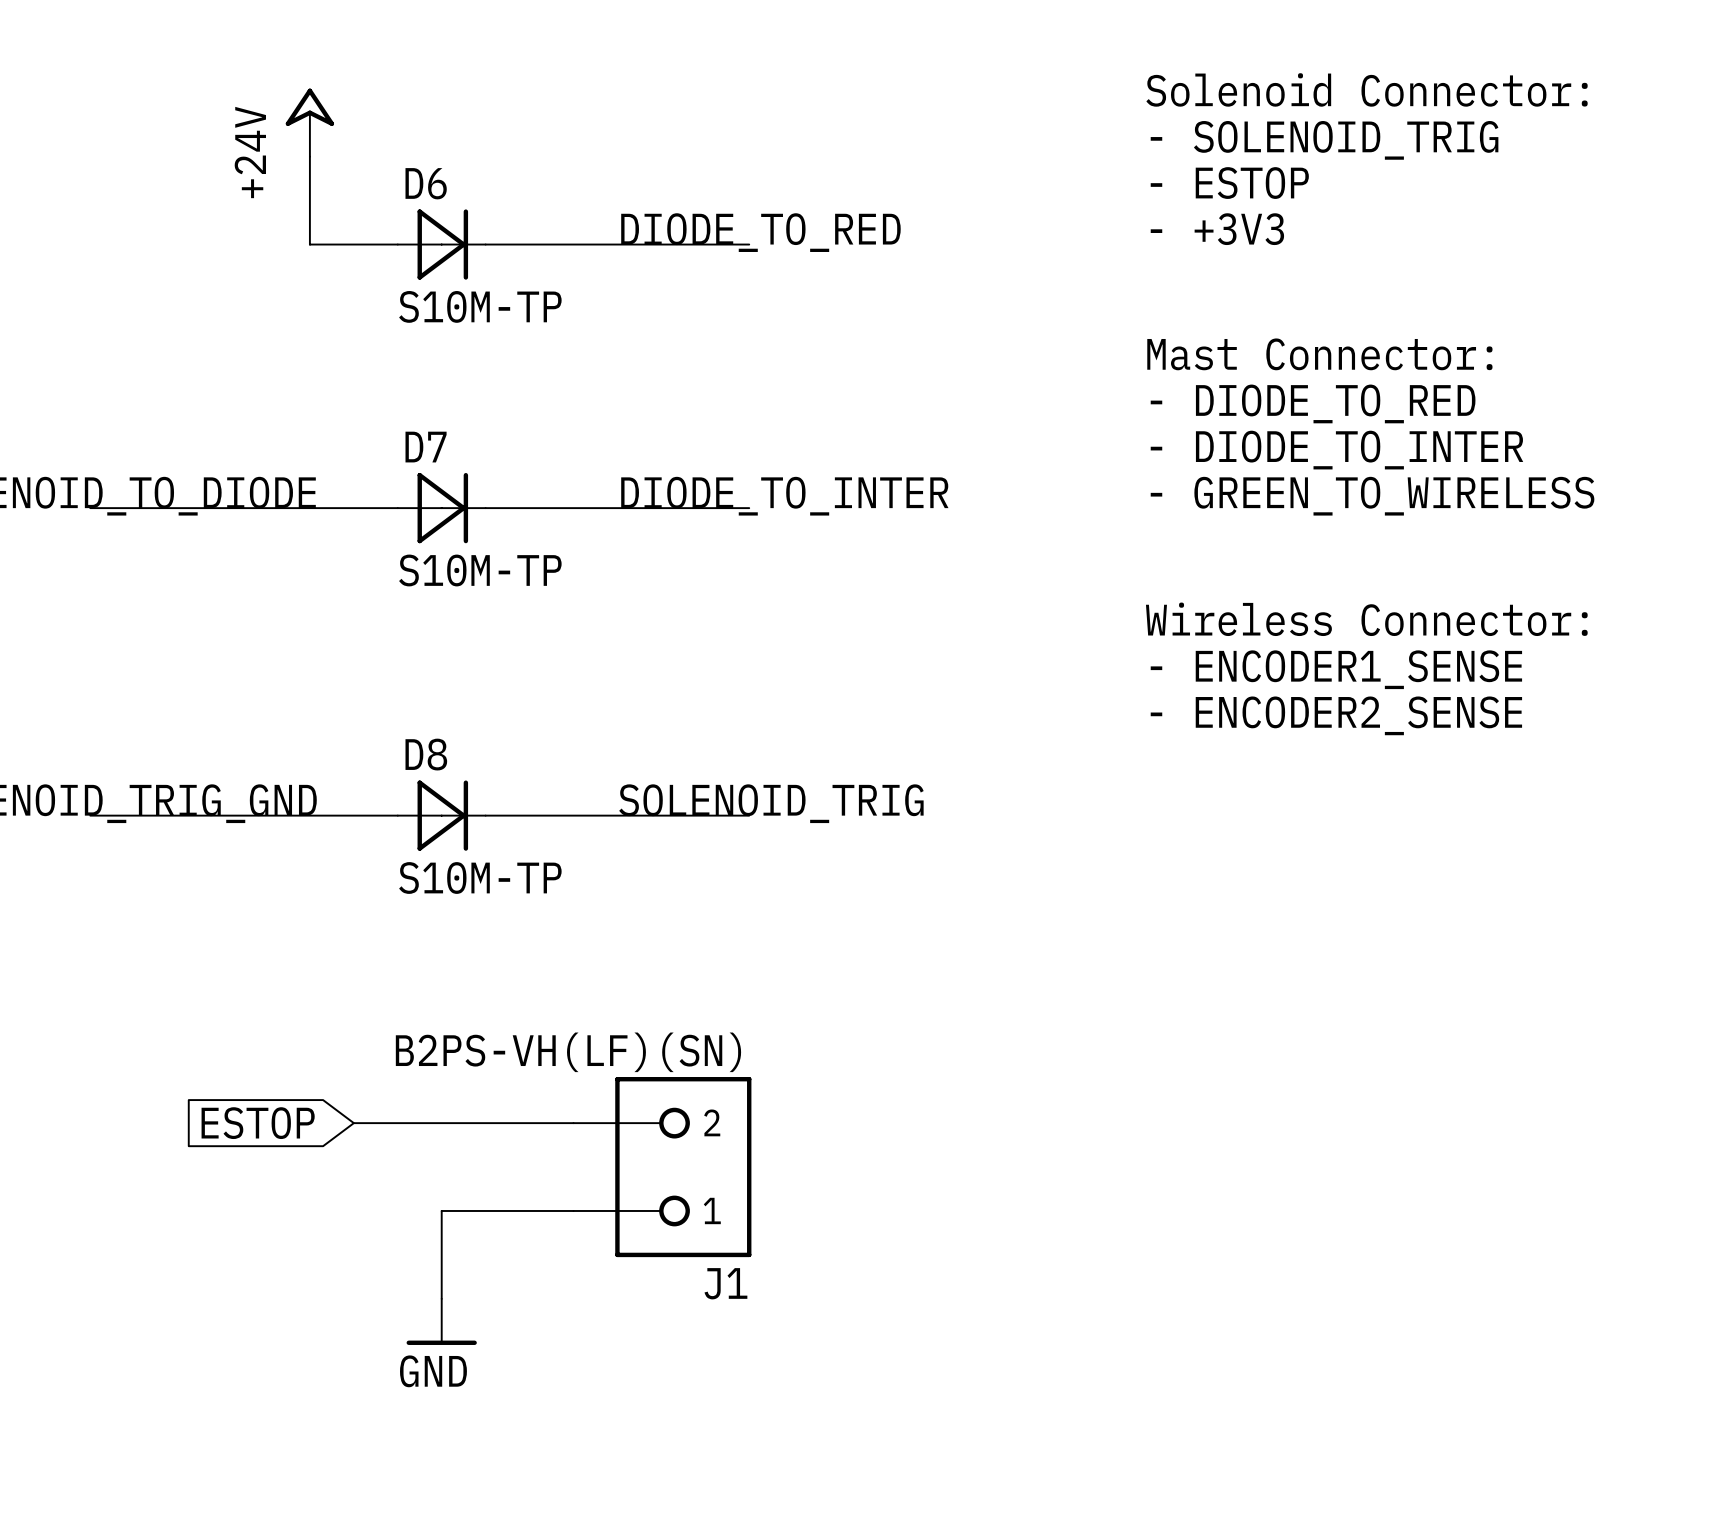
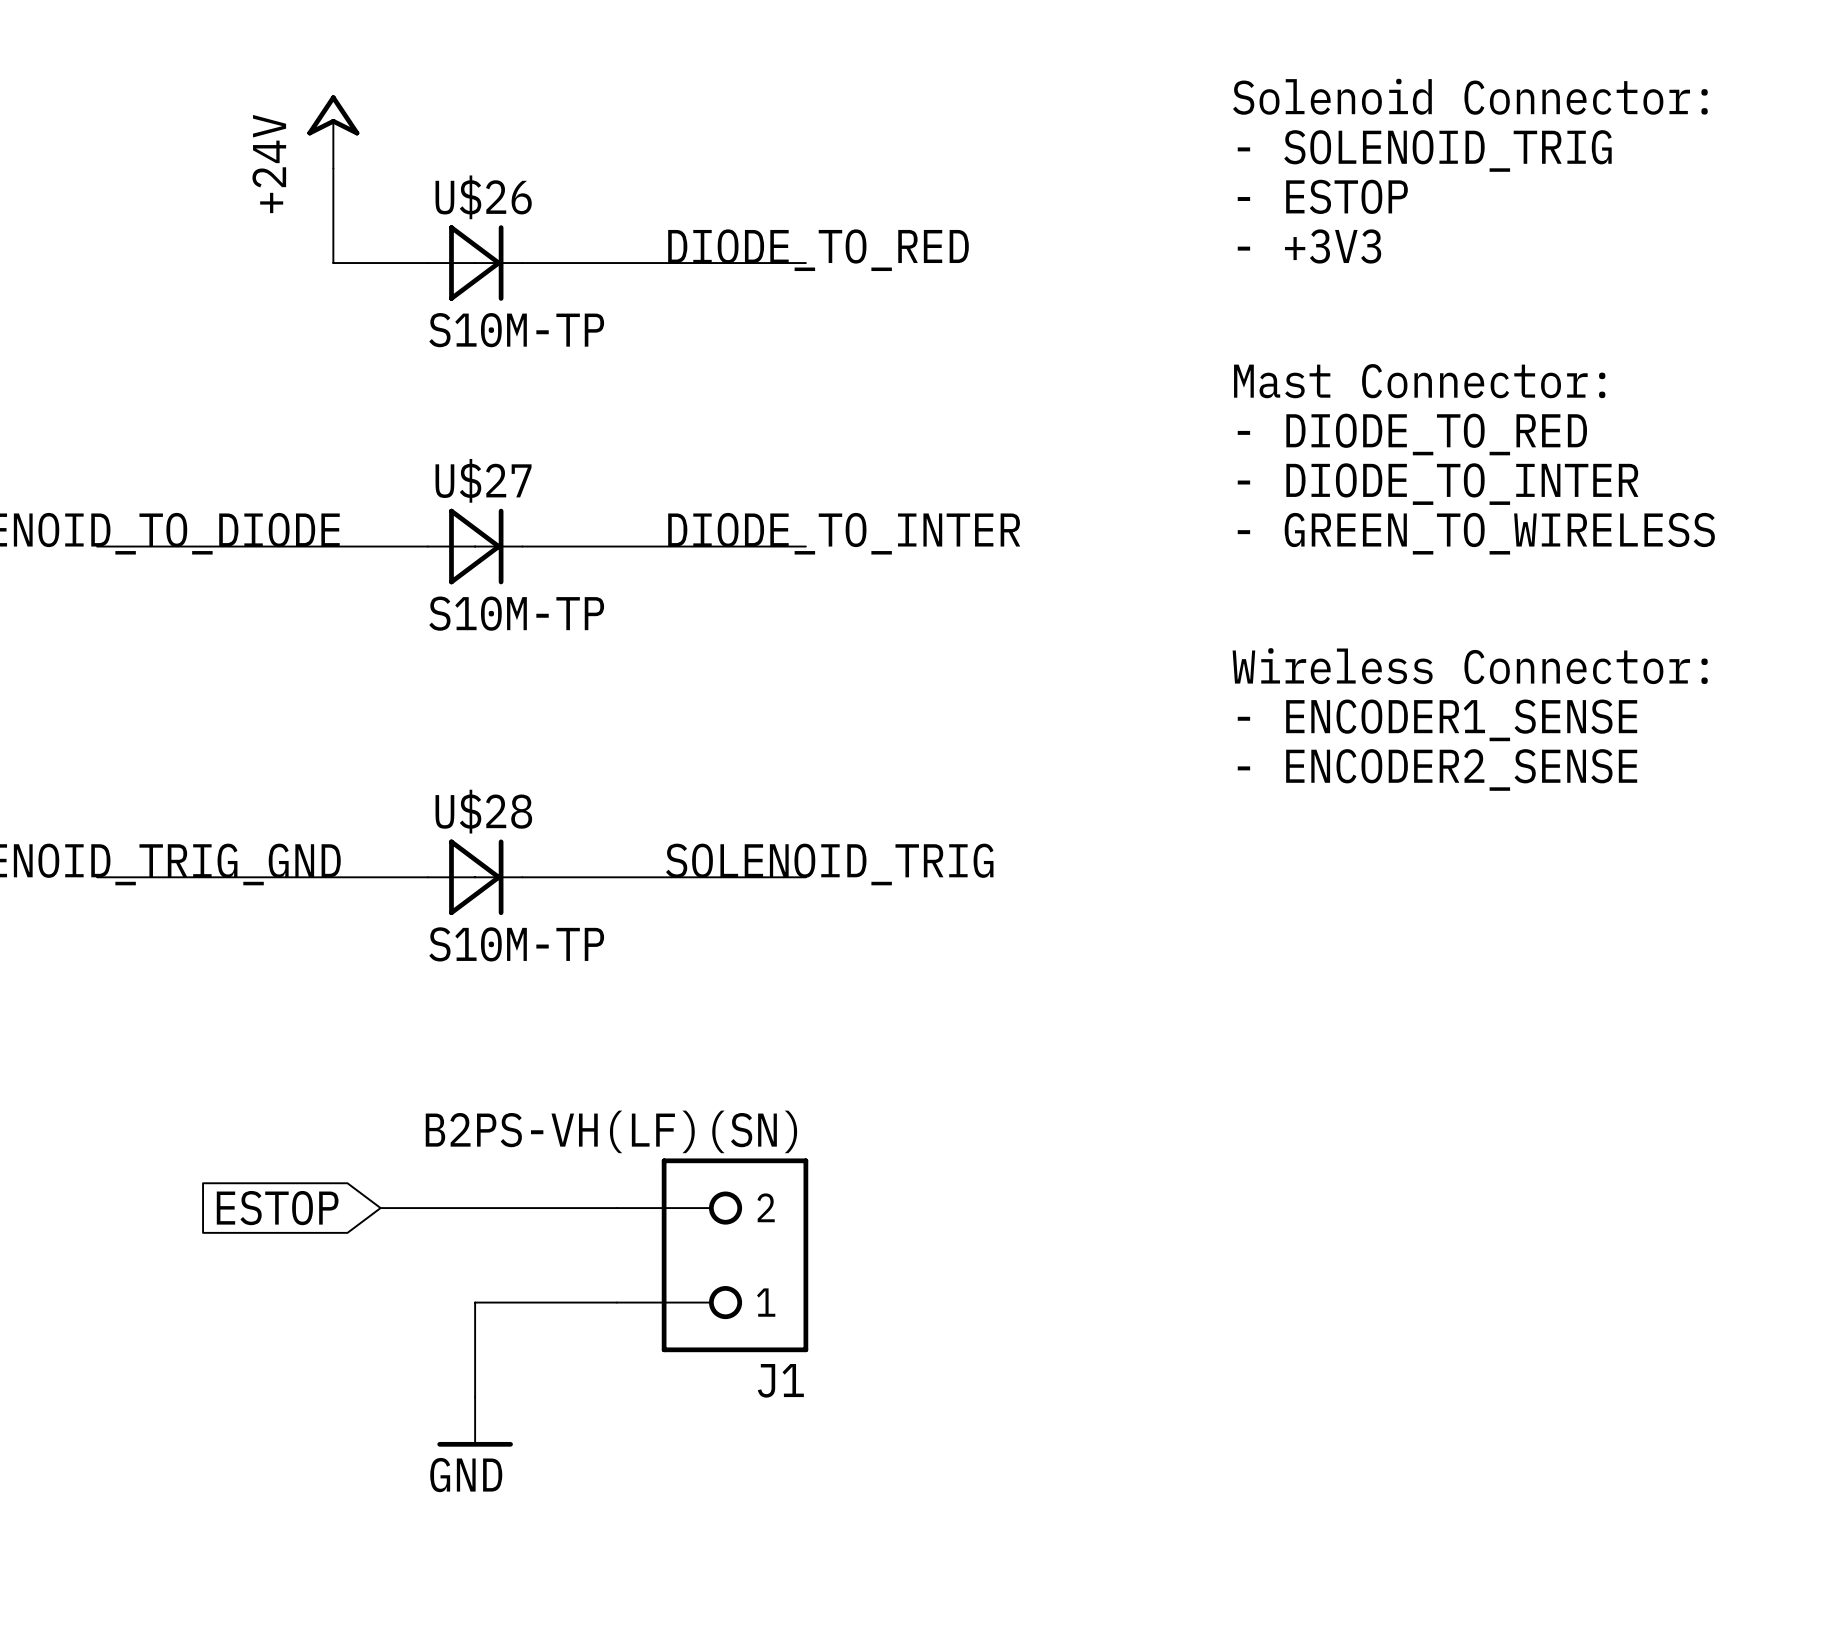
D6 name: D6 (426, 183) -> U$26 (483, 197)
D7 name: D7 (426, 447) -> U$27 (483, 480)
D8 name: D8 (426, 754) -> U$28 (483, 811)

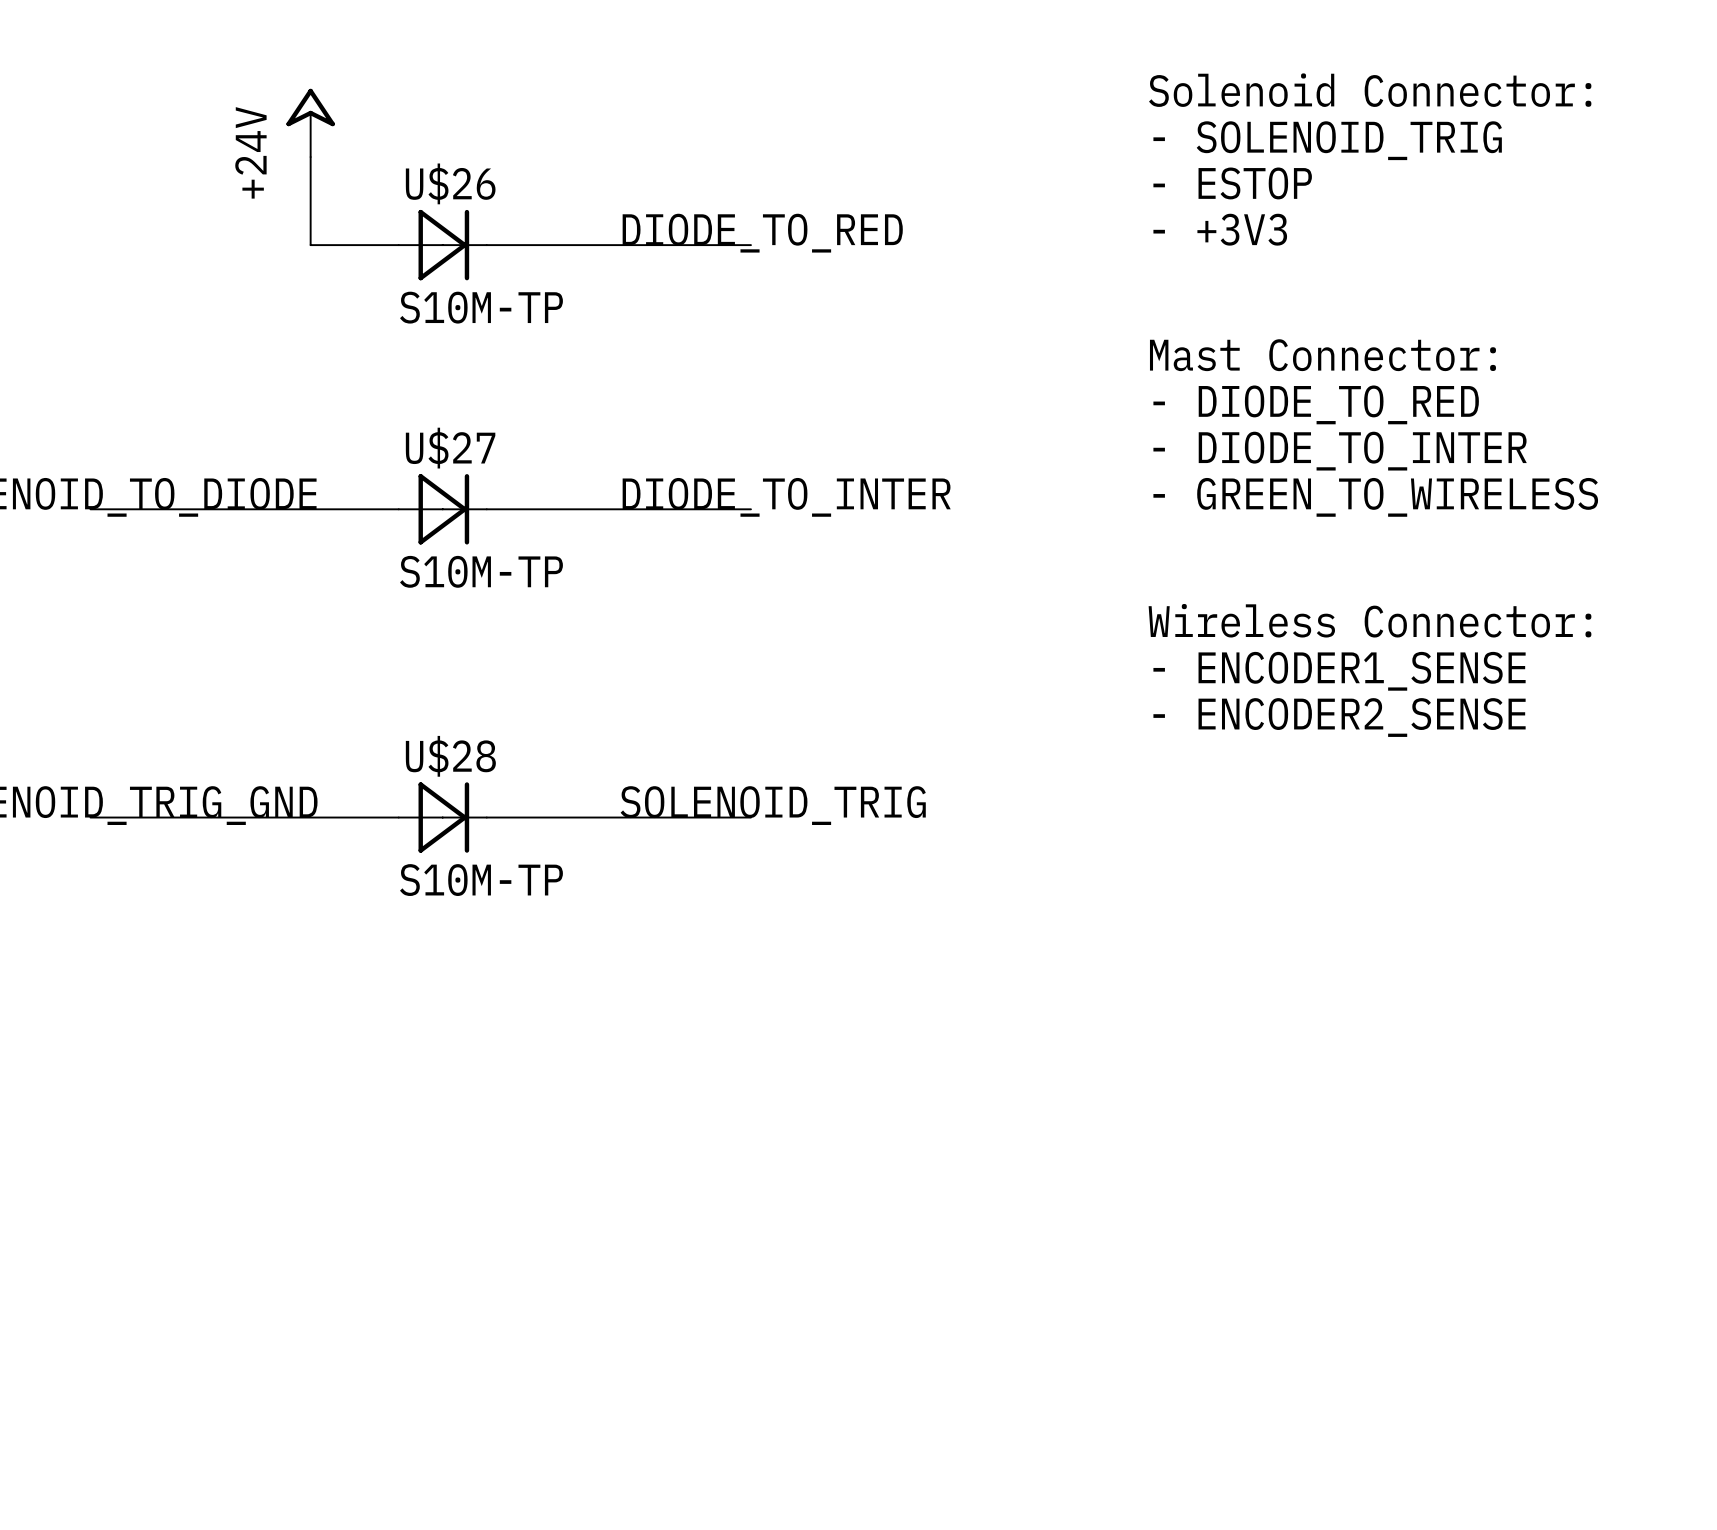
global label: ESTOP (277, 1208) -> none
wire: (380, 1208) (616, 1208) -> none
J1: B2PS-VH(LF)(SN) (712, 1255) -> none
wire: (616, 1302) (475, 1302) (475, 1397) -> none
power symbol: GND (475, 1421) -> none

